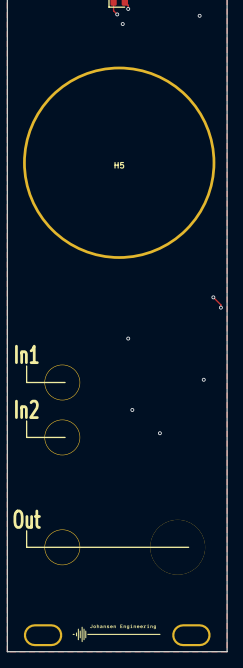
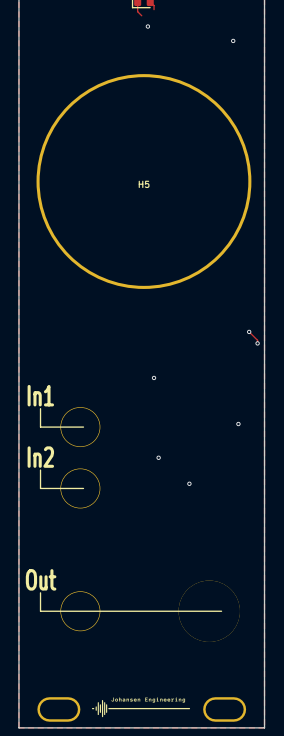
via: (128, 8) -> none
via: (117, 14) -> none
via position: (199, 15) -> (233, 40)

